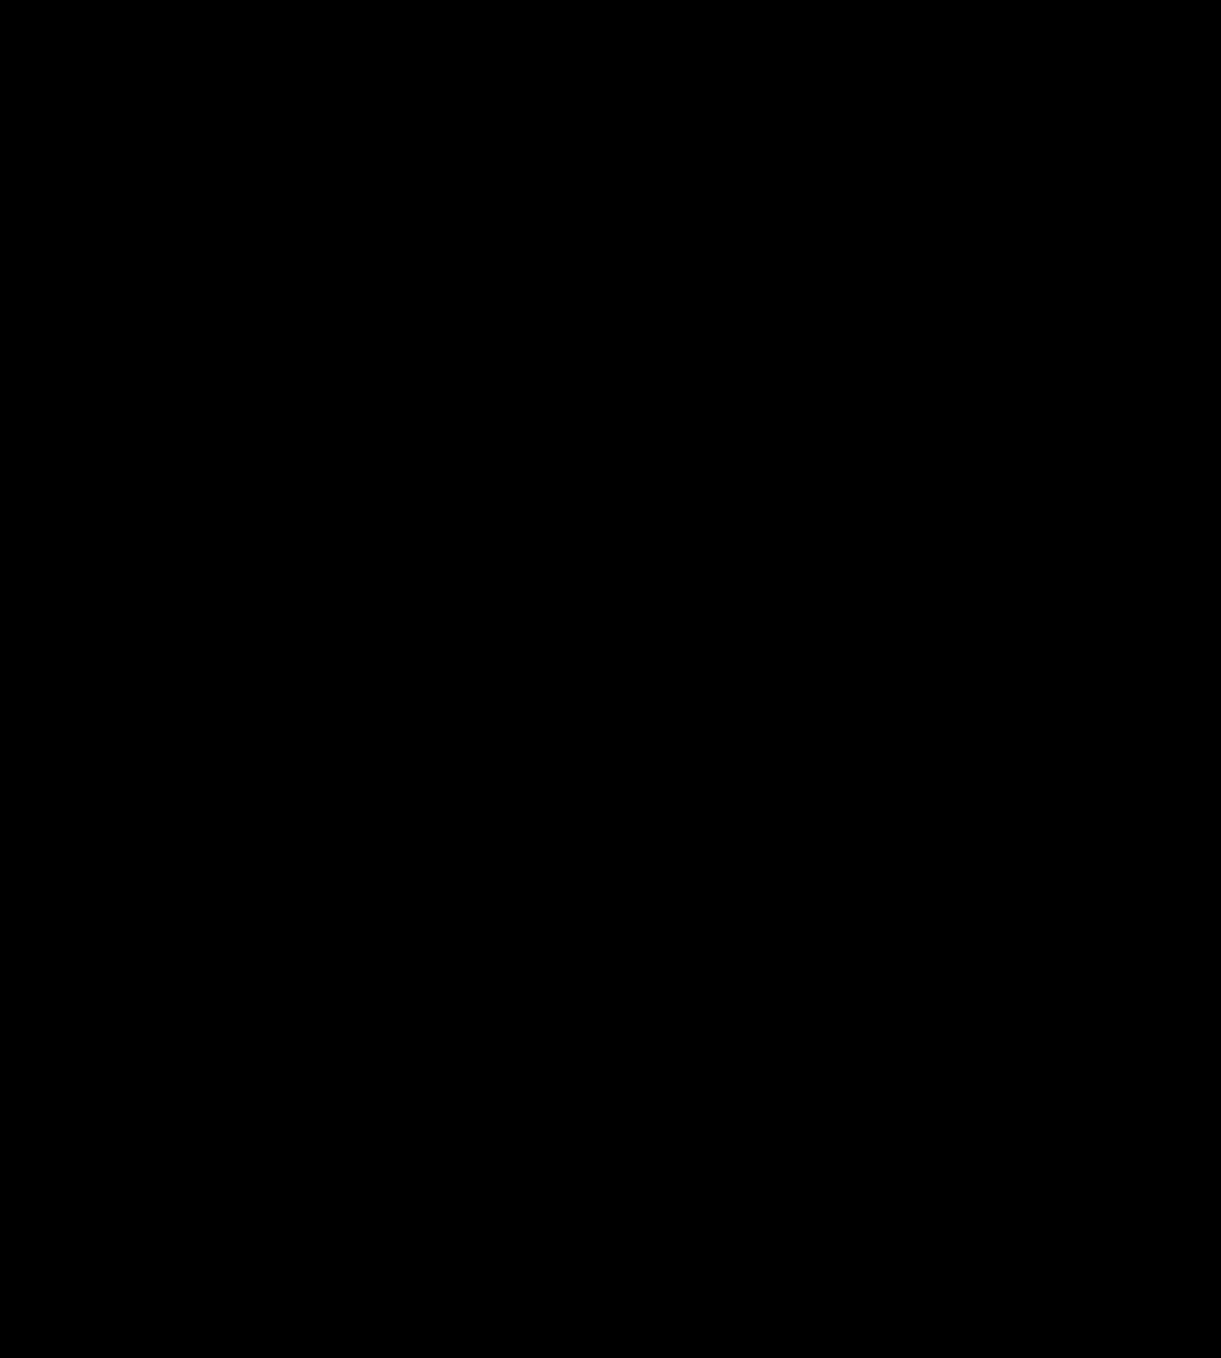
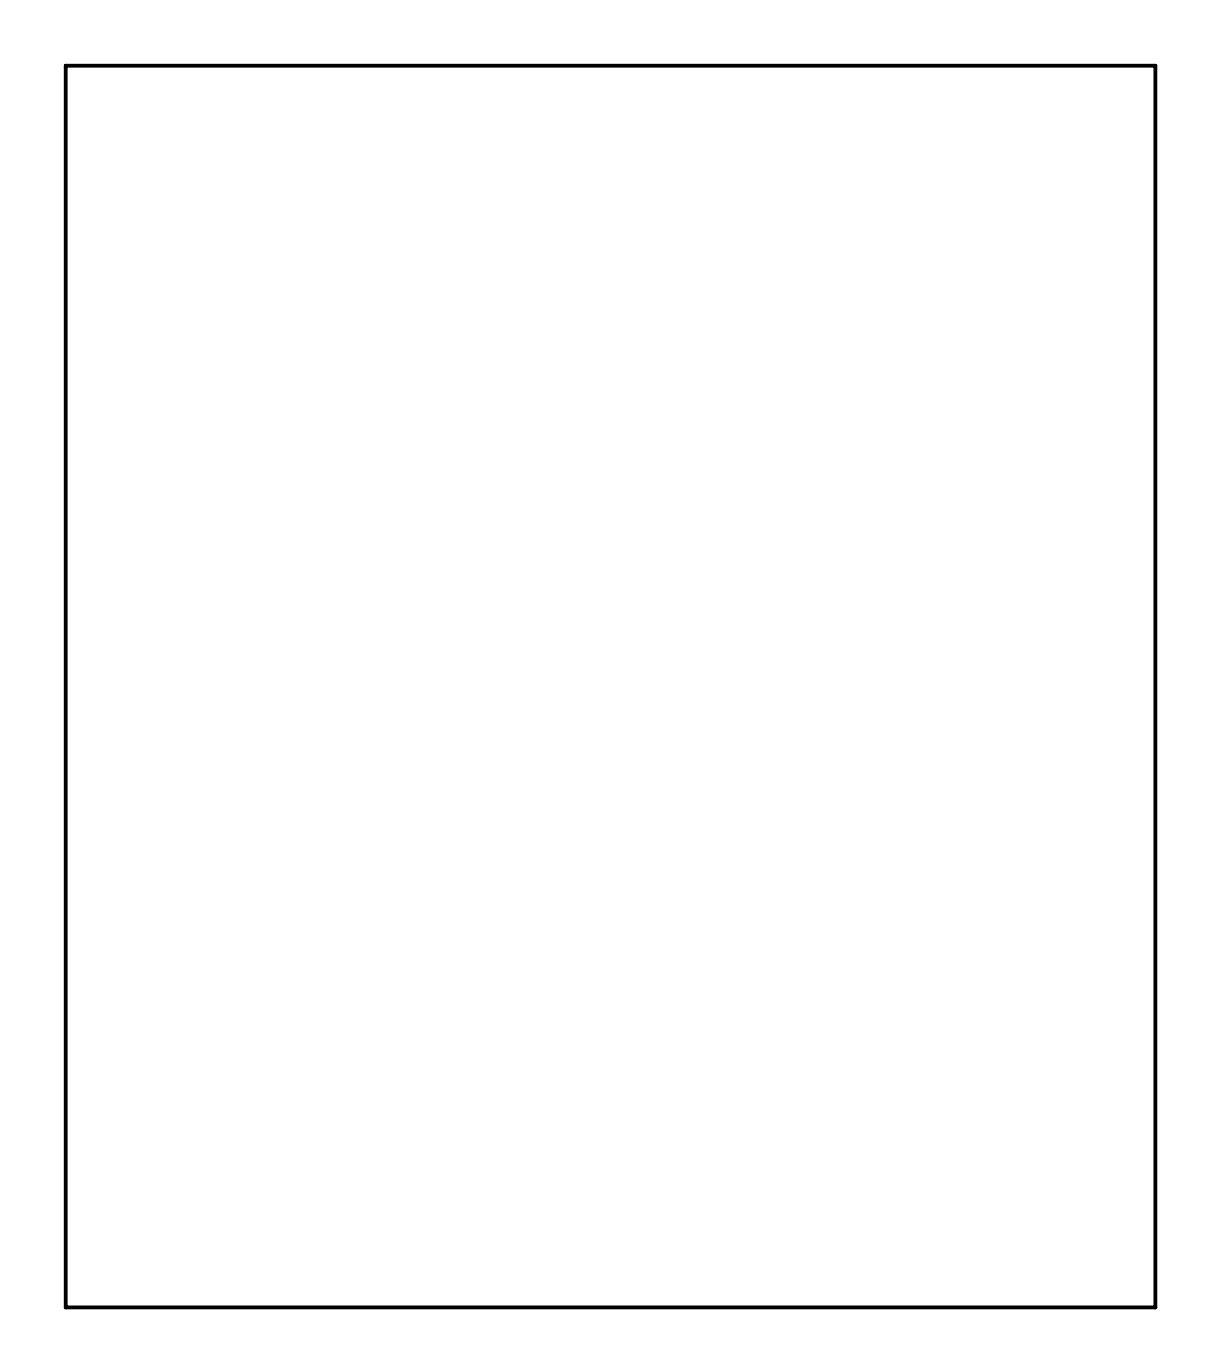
board edge: none -> (65, 65) (65, 1307) (1155, 1307) (1155, 65) (65, 65)

